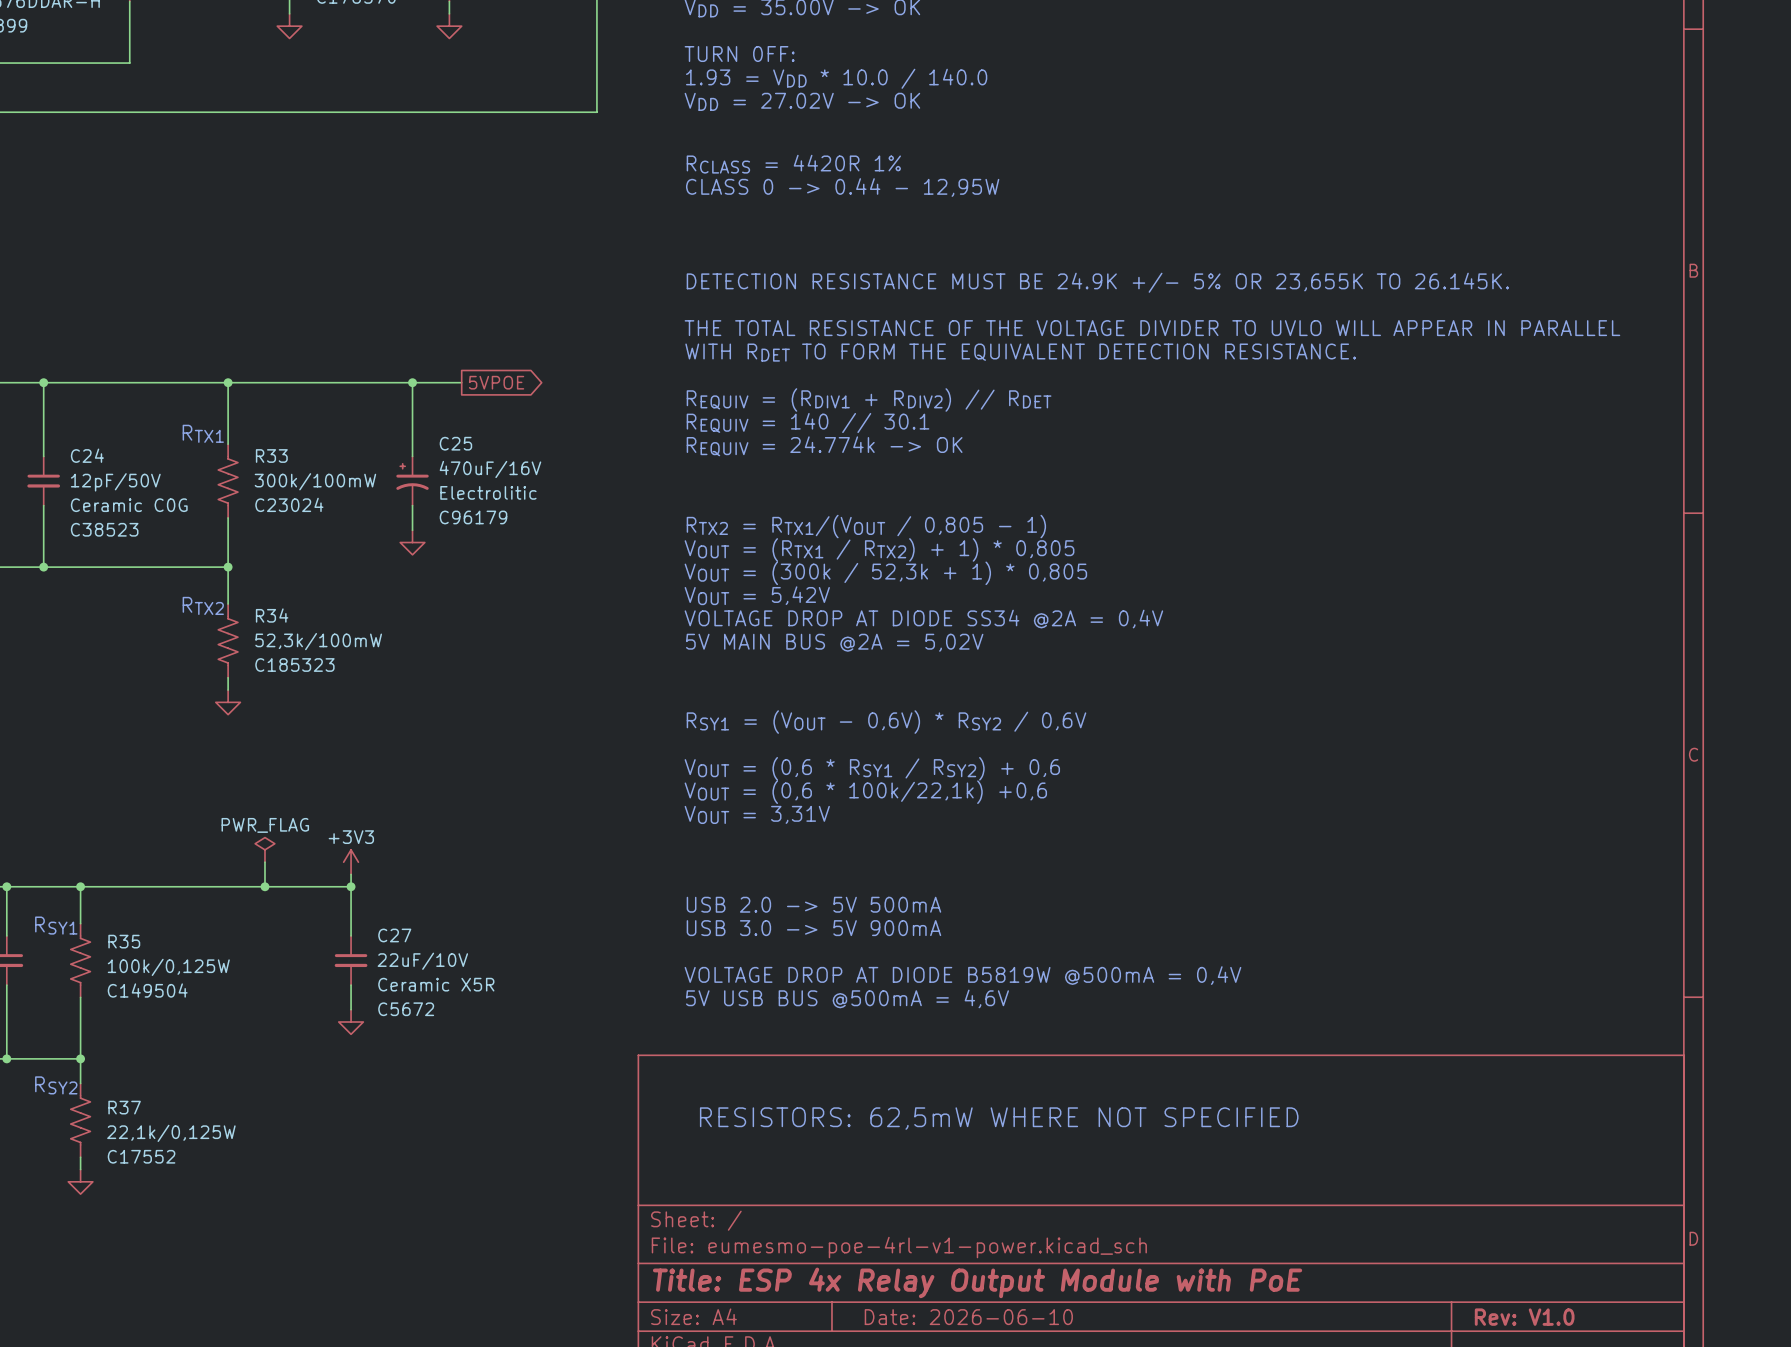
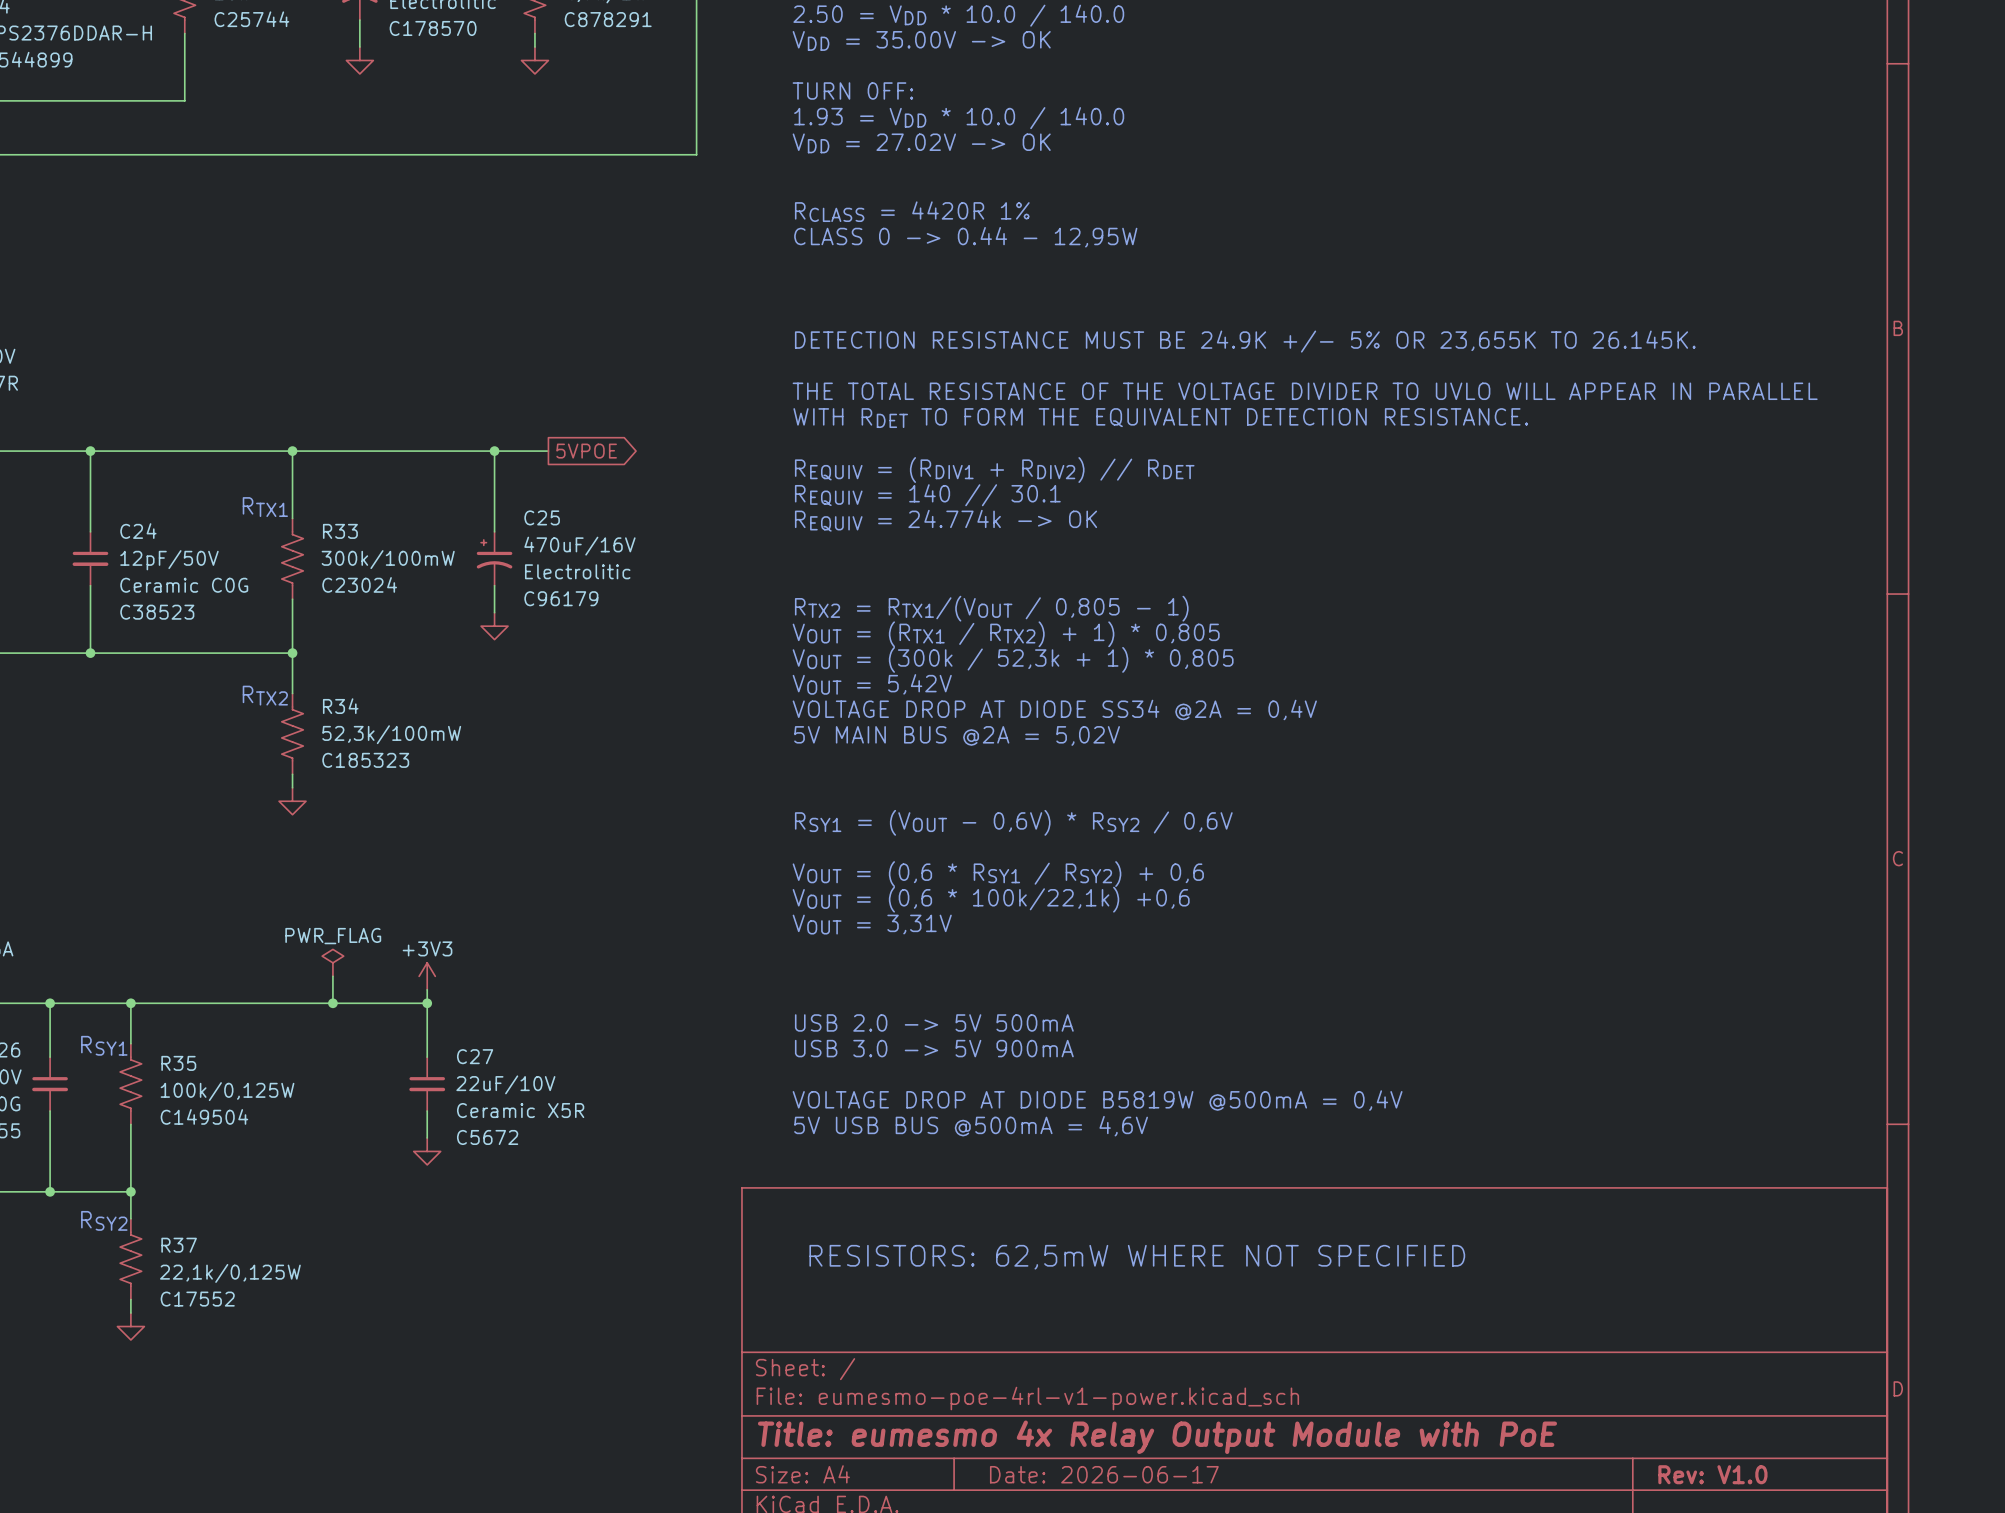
title block: Title: ESP 4x Relay Output Module with PoE (977, 1282) -> Title: eumesmo 4x Relay Output Module with PoE (1157, 1437)
title block: Date: 2026-06-10 (968, 1317) -> Date: 2026-06-17 (1104, 1474)

